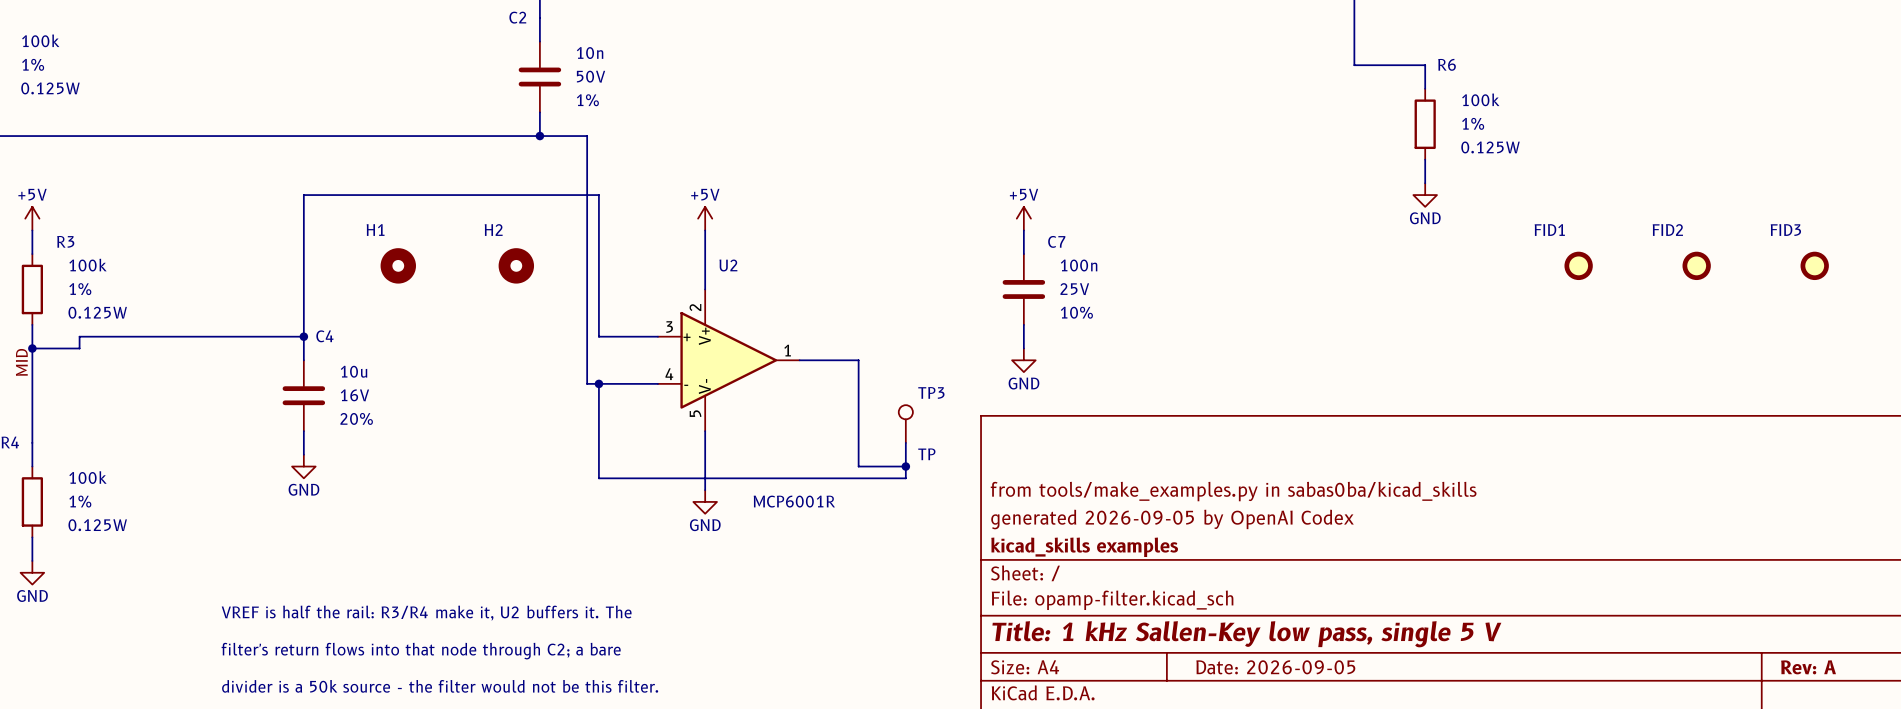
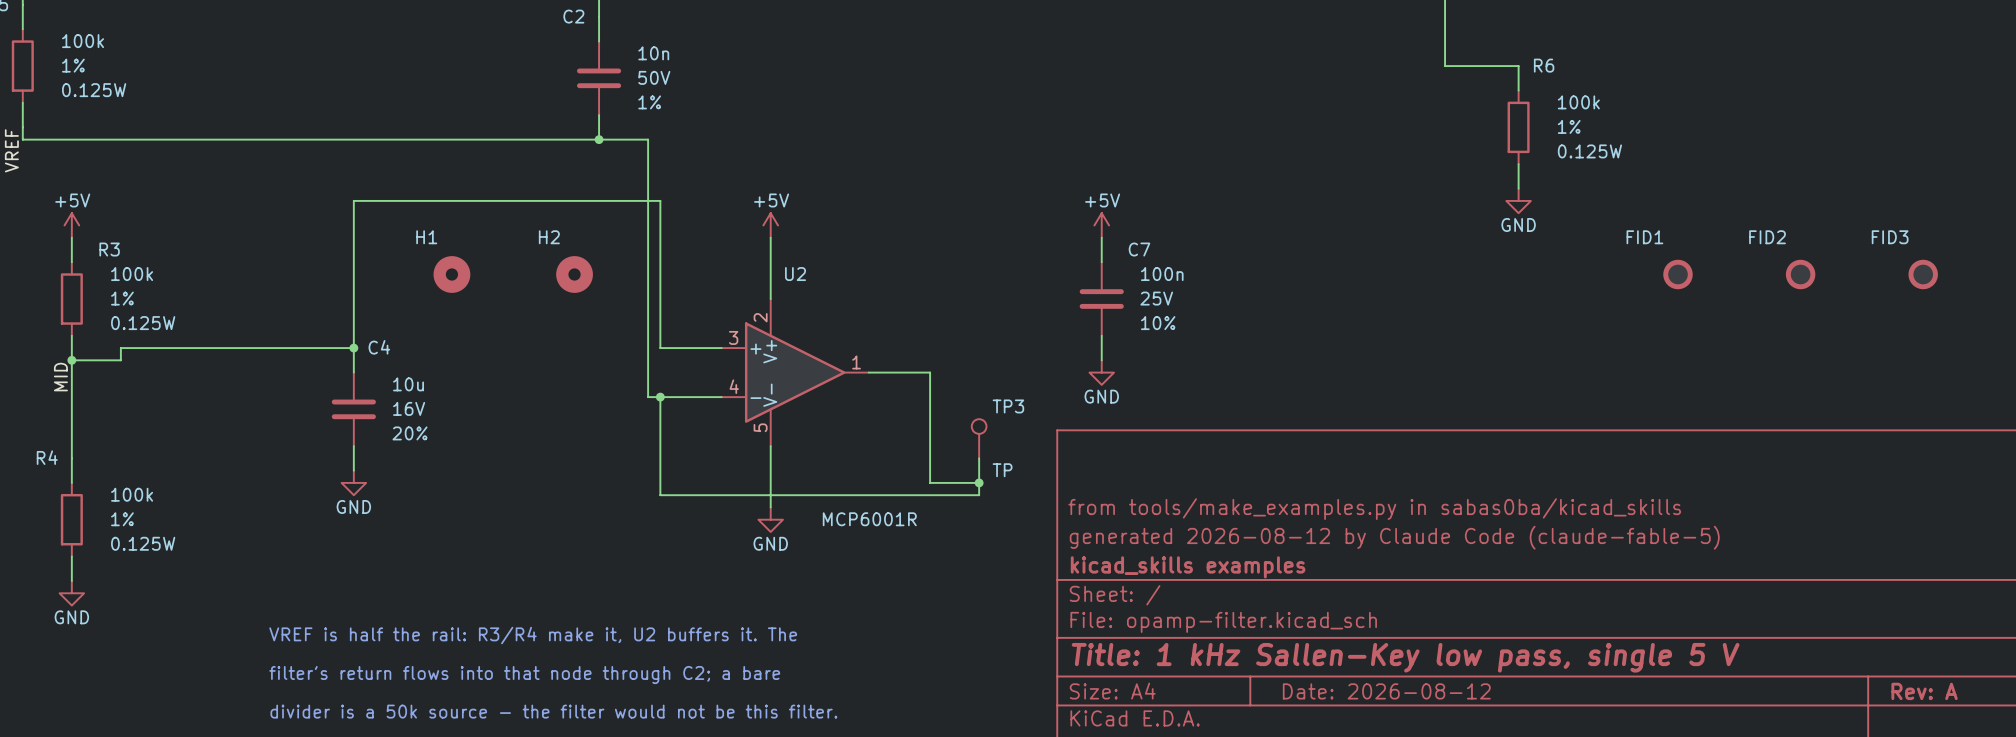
title block: generated 2026-09-05 by OpenAI Codex (1172, 519) -> generated 2026-08-12 by Claude Code (claude-fable-5) (1394, 537)
title block: Date: 2026-09-05 (1275, 667) -> Date: 2026-08-12 (1386, 691)

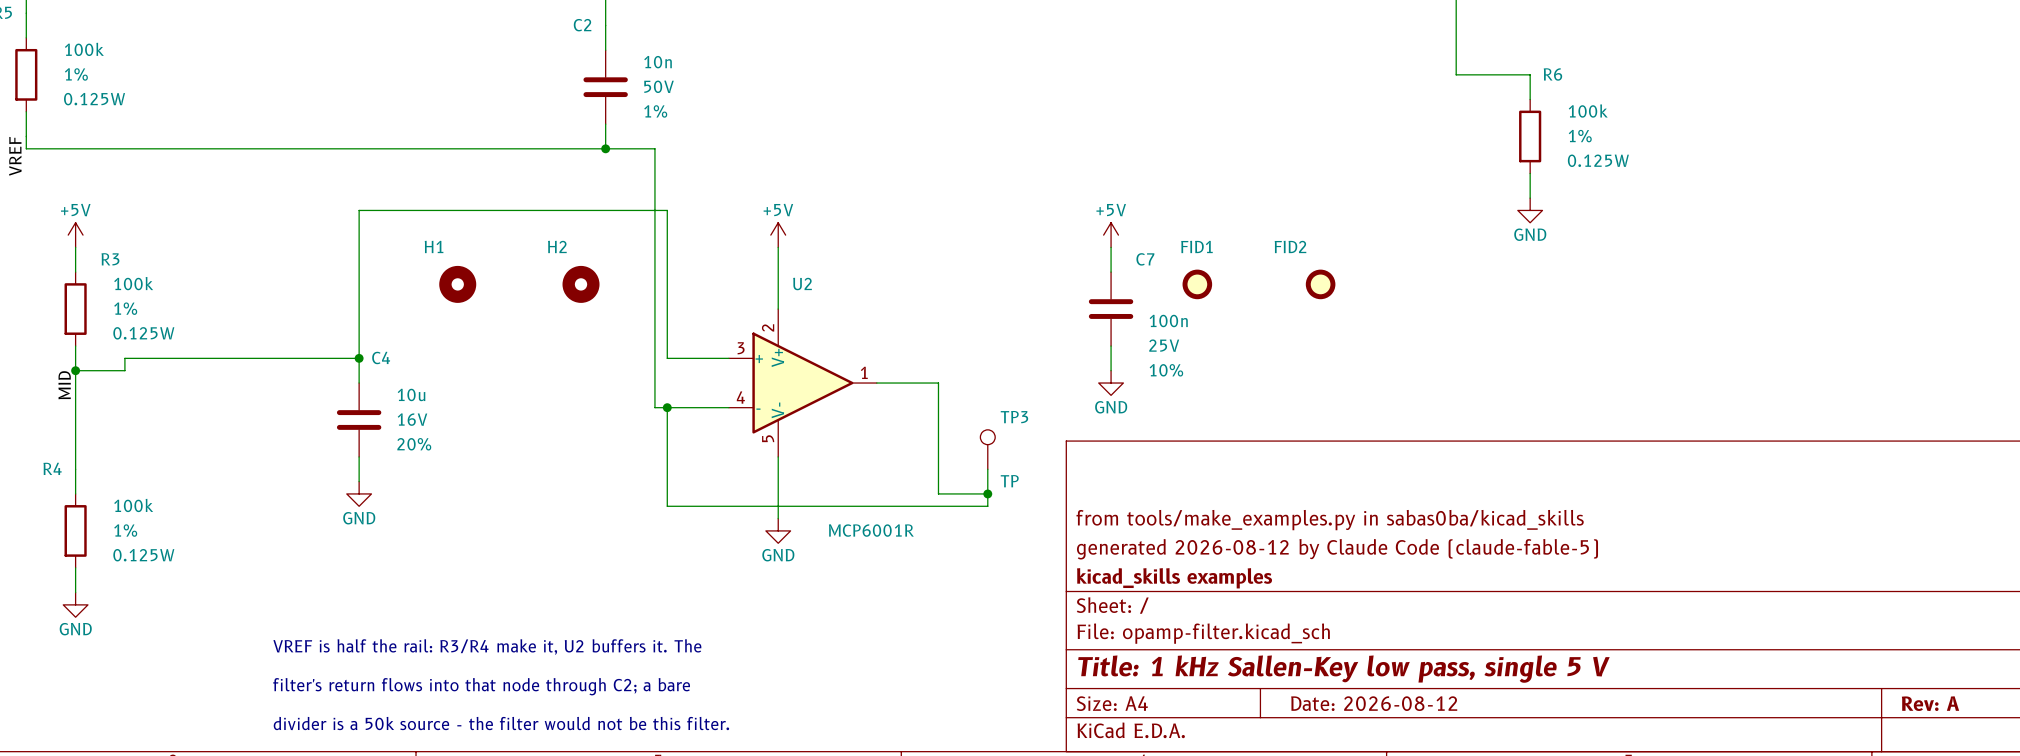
FID1 name position: FID1 (1644, 237) -> FID1 (1196, 246)
C7 value position: 100n (1162, 274) -> 100n (1168, 320)
FID1 position: (1677, 274) -> (1197, 284)
FID2 position: (1800, 274) -> (1320, 284)
FID3: (1923, 274) -> none
C7 text position: 25V (1156, 298) -> 25V (1164, 345)
C7 text position: 10% (1158, 323) -> 10% (1166, 370)

